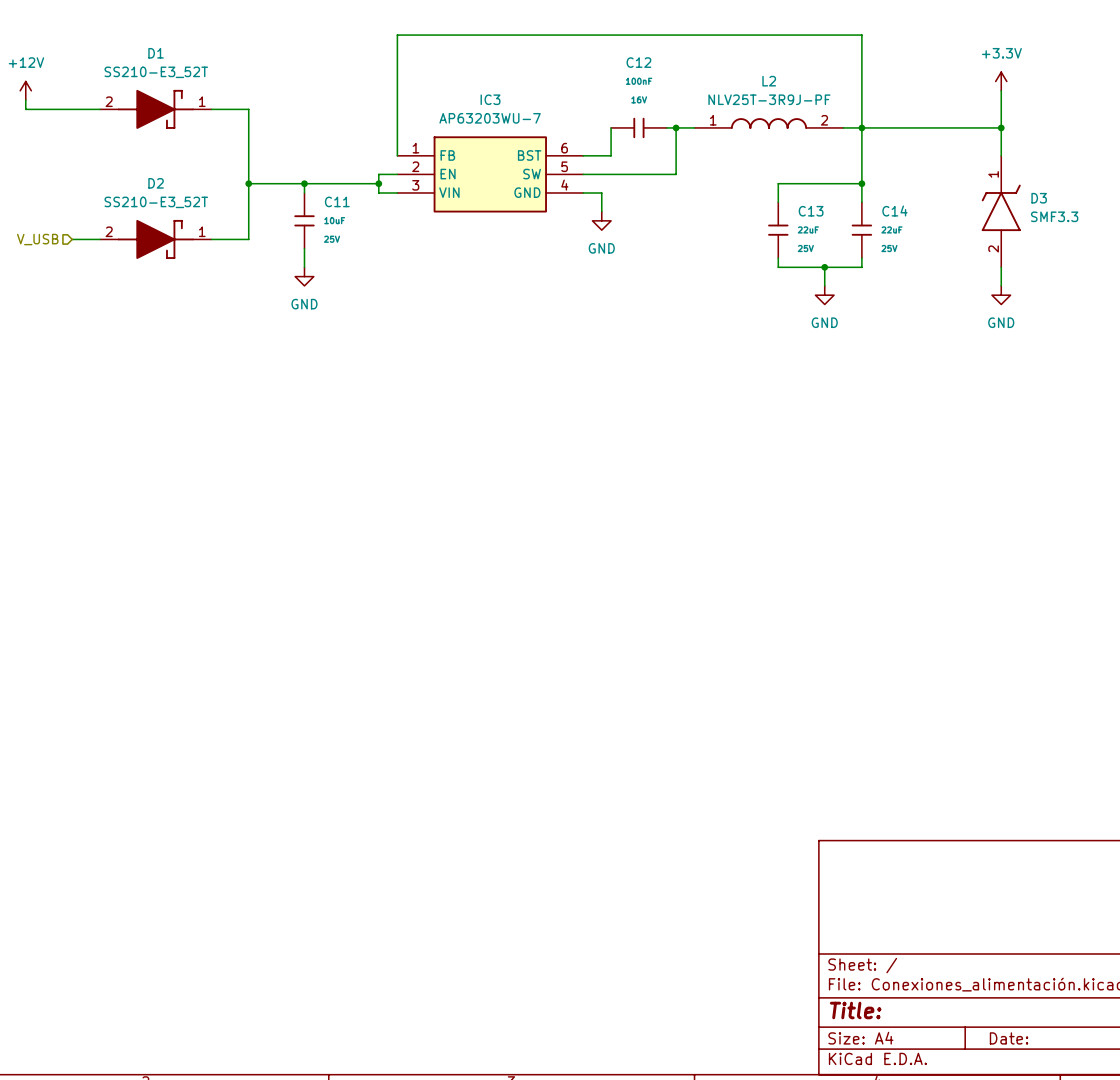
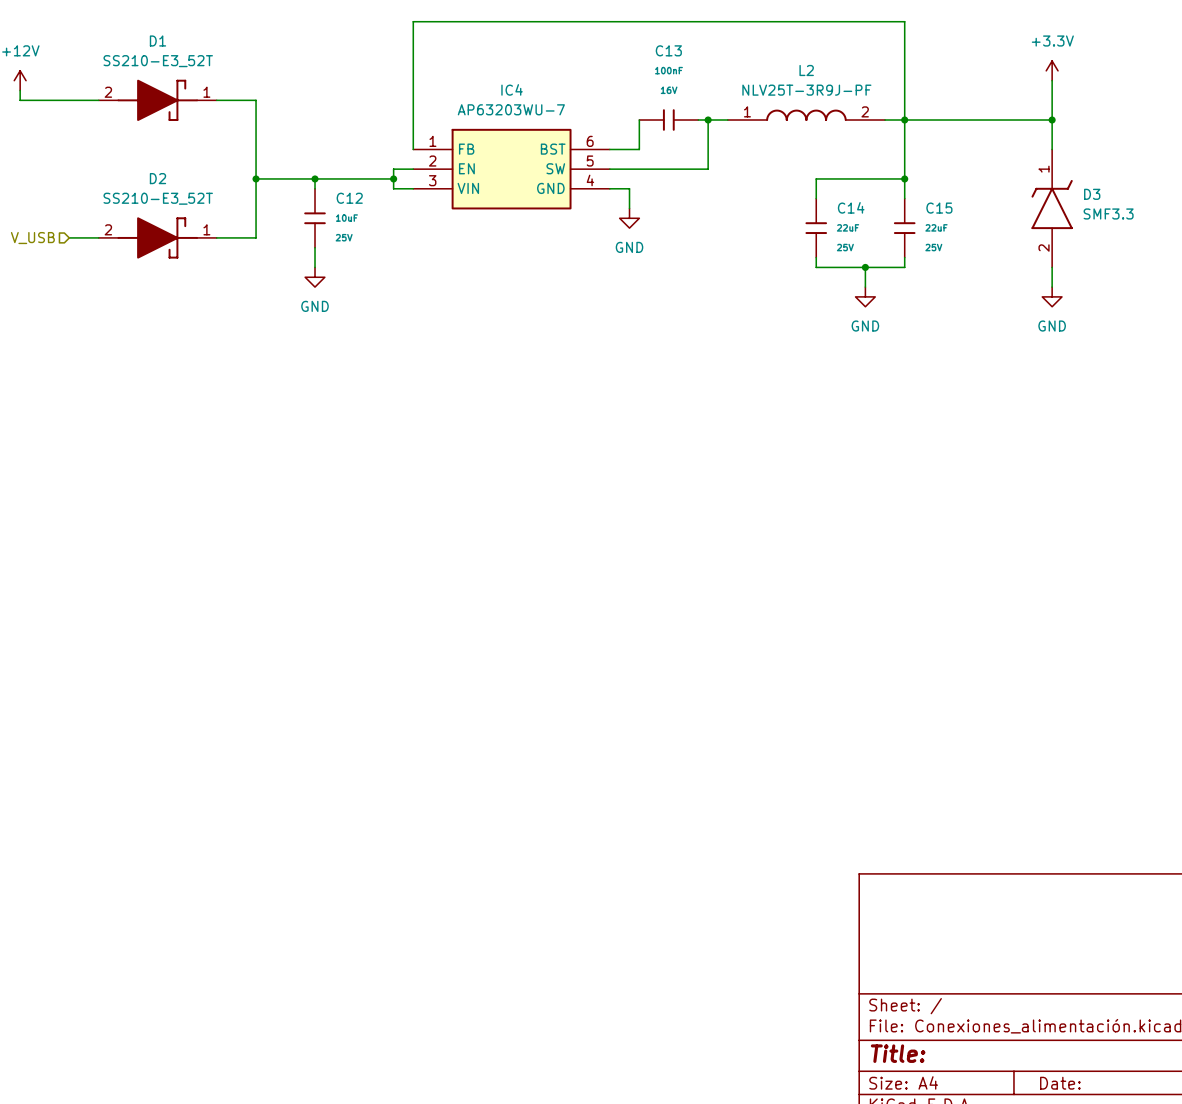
C12 name: C12 (638, 62) -> C13 (668, 50)
IC3 name: IC3 (490, 99) -> IC4 (512, 89)
C11 name: C11 (337, 201) -> C12 (349, 198)
C13 name: C13 (811, 211) -> C14 (851, 207)
C14 name: C14 (894, 211) -> C15 (939, 208)

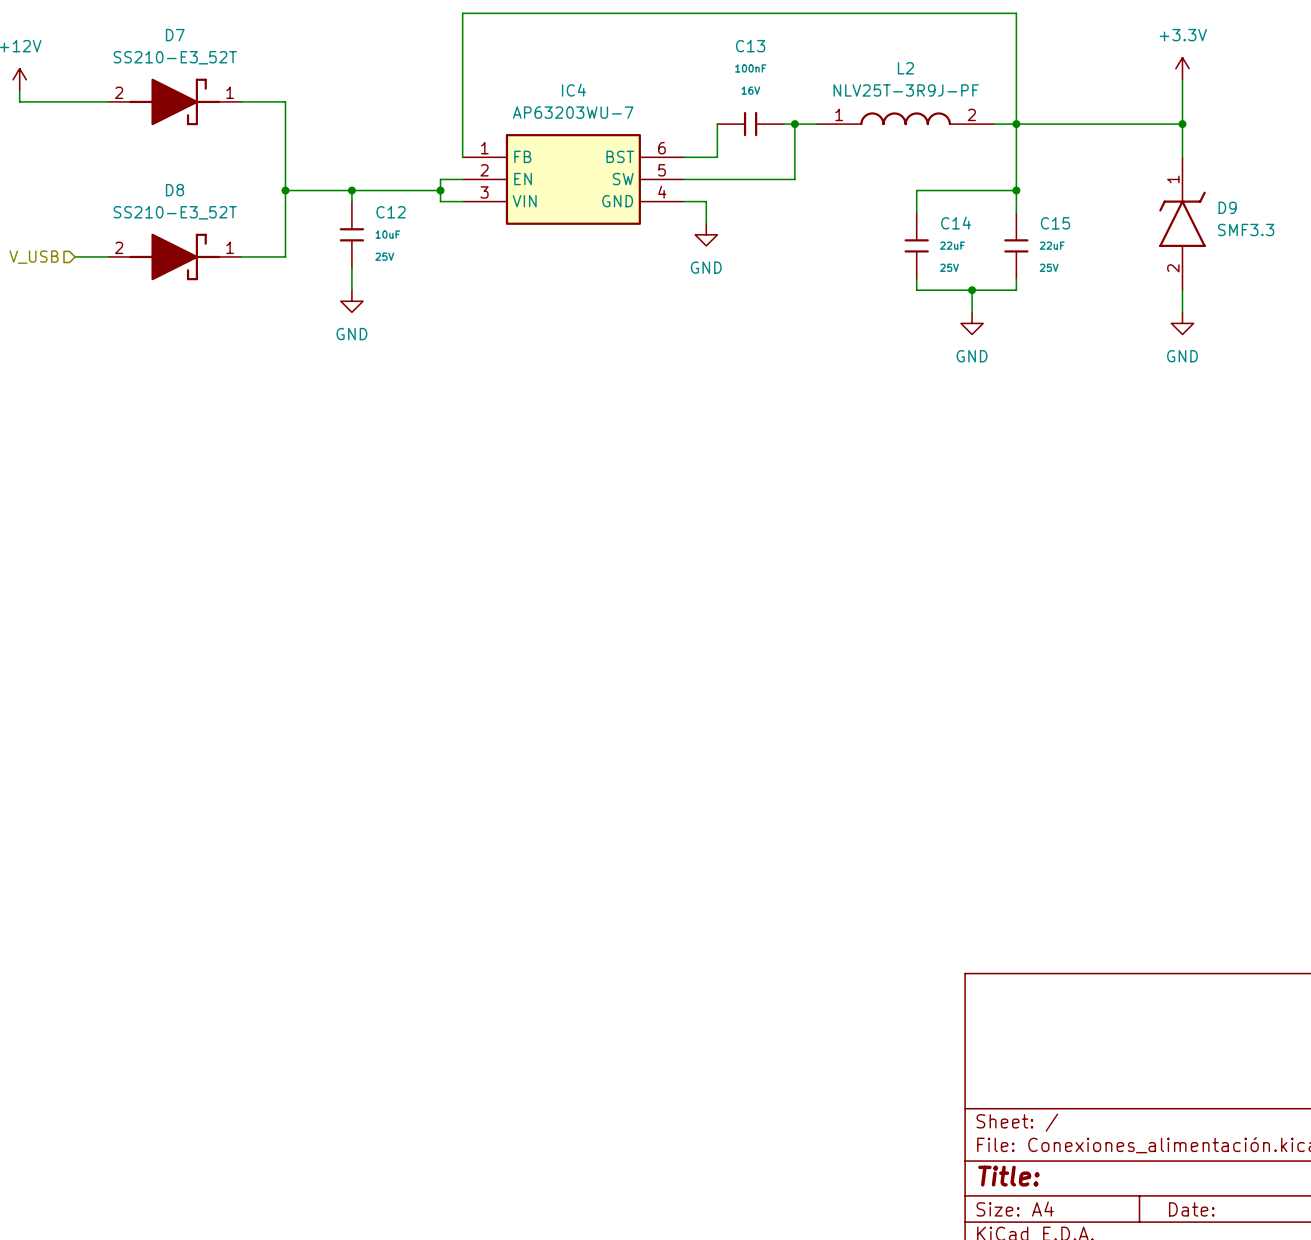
D1 name: D1 (157, 41) -> D7 (175, 35)
D2 name: D2 (157, 178) -> D8 (174, 190)
D3 name: D3 (1092, 194) -> D9 (1227, 207)

